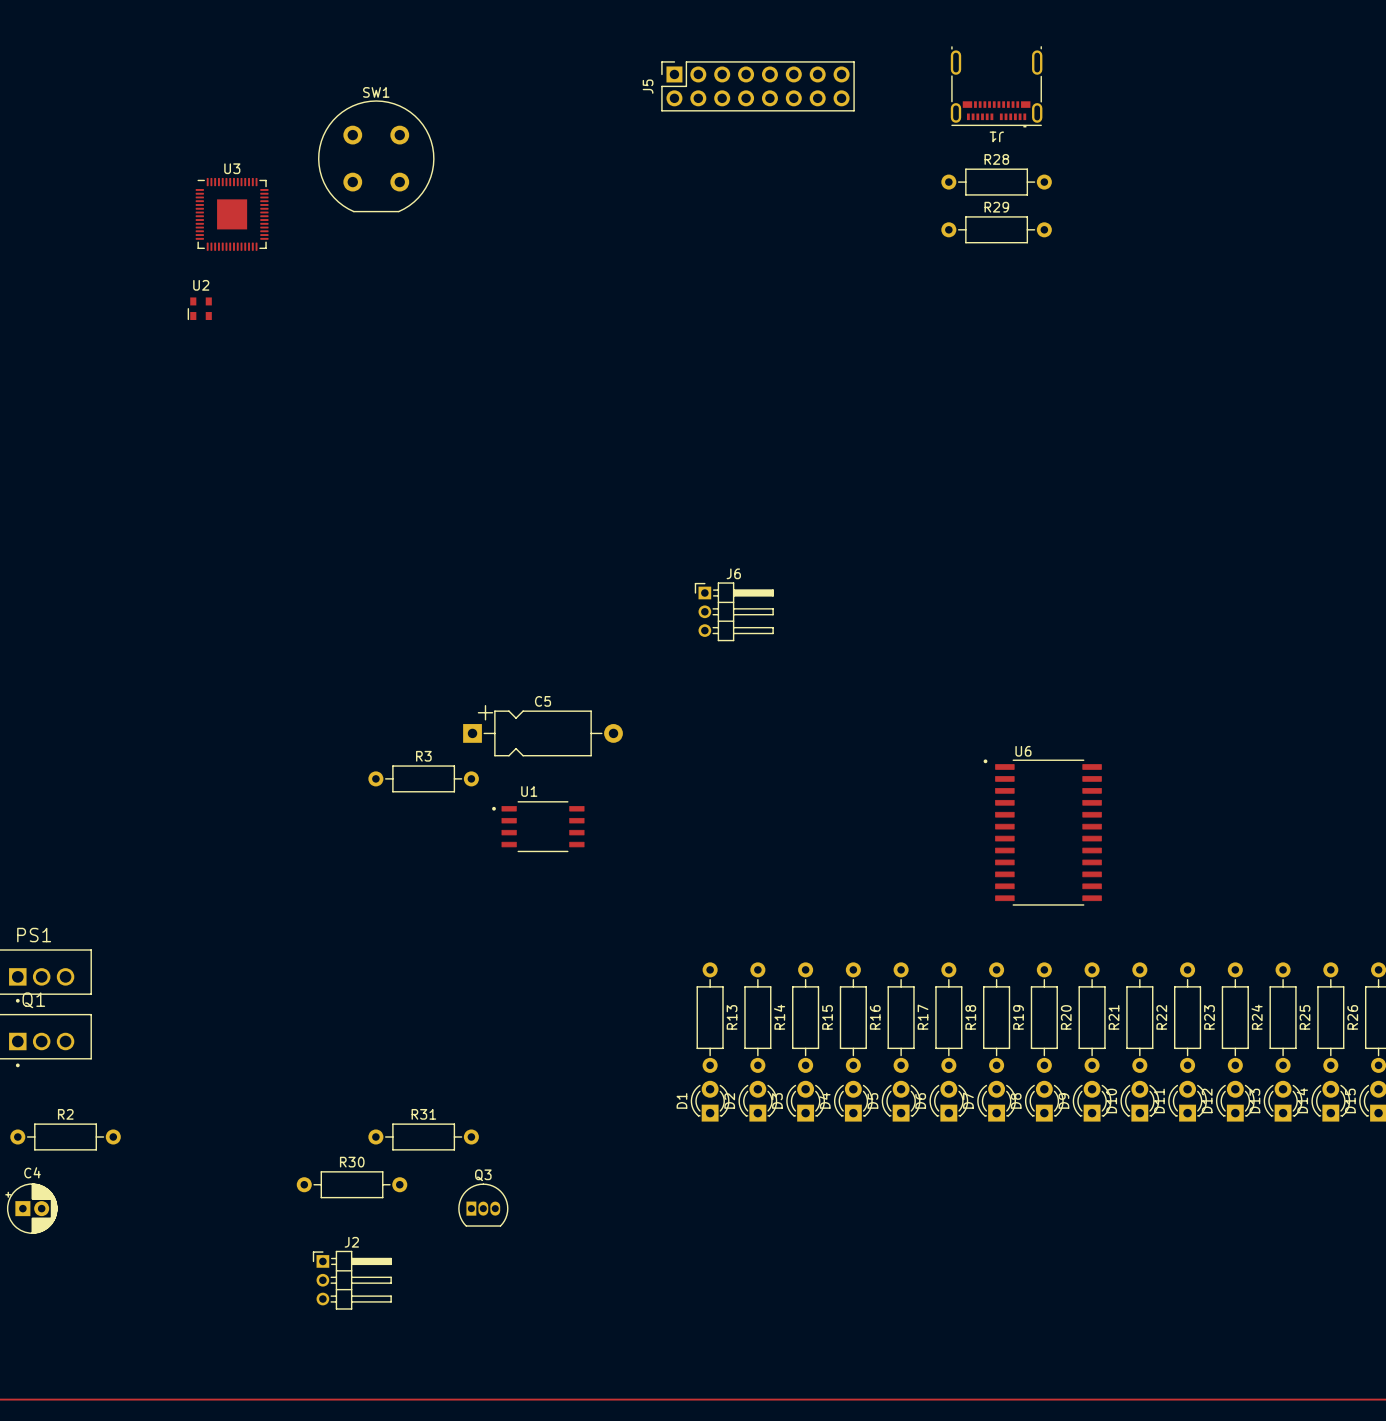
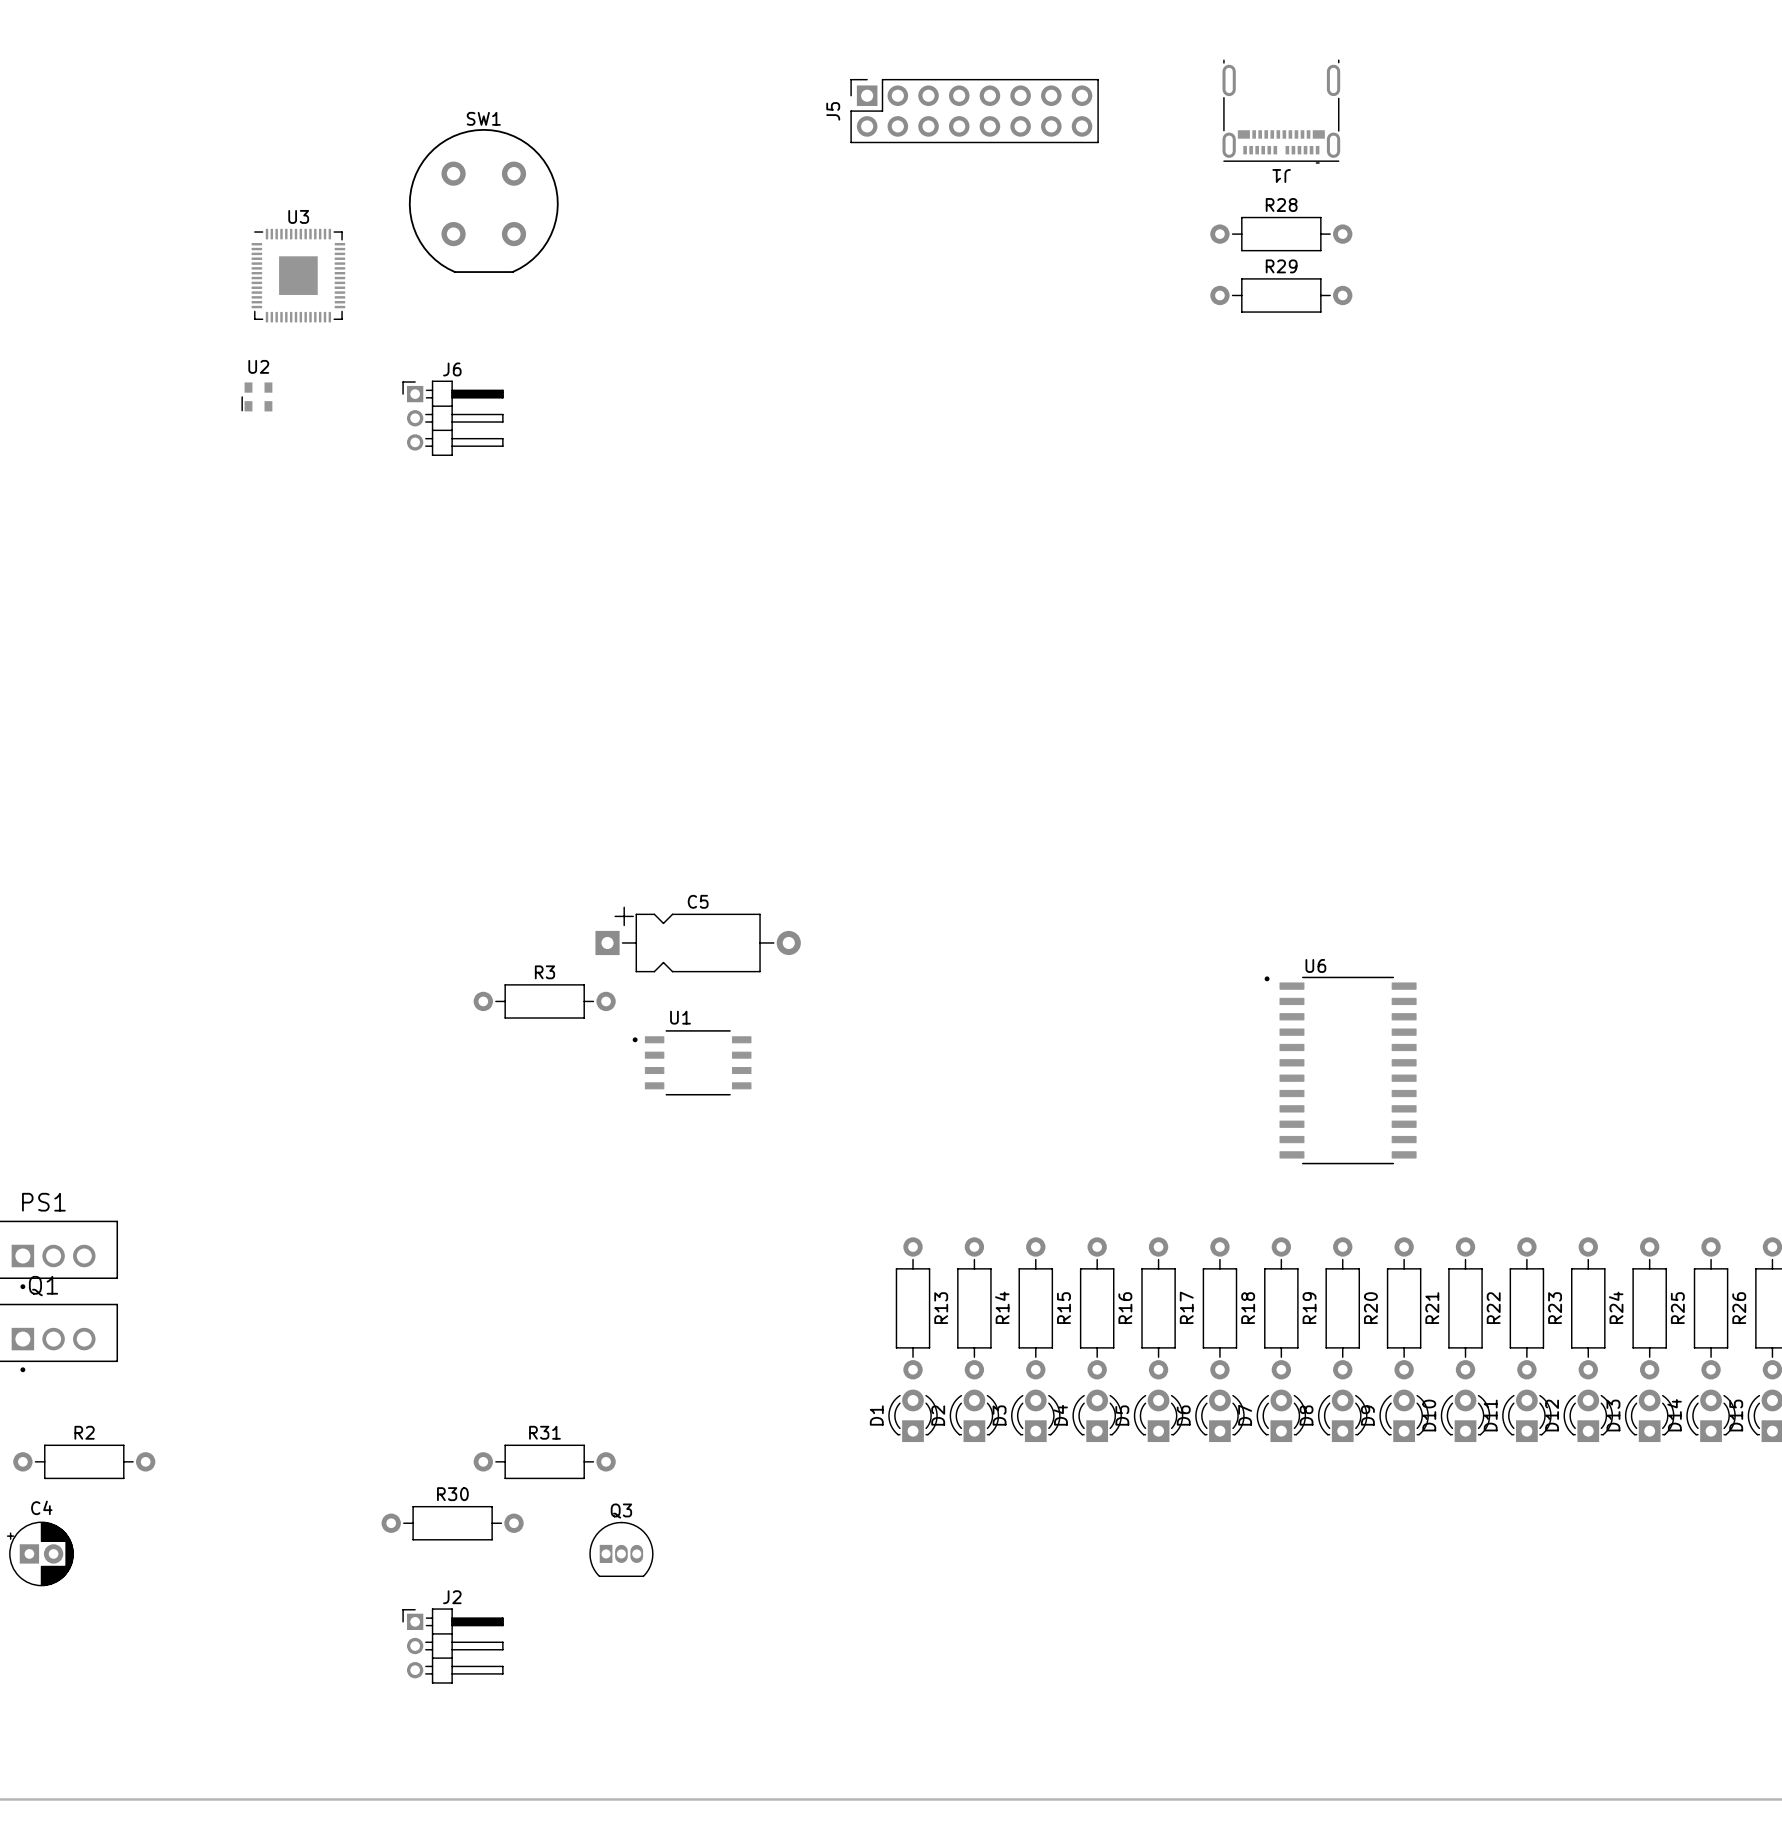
J6 position: (734, 611) -> (452, 418)

